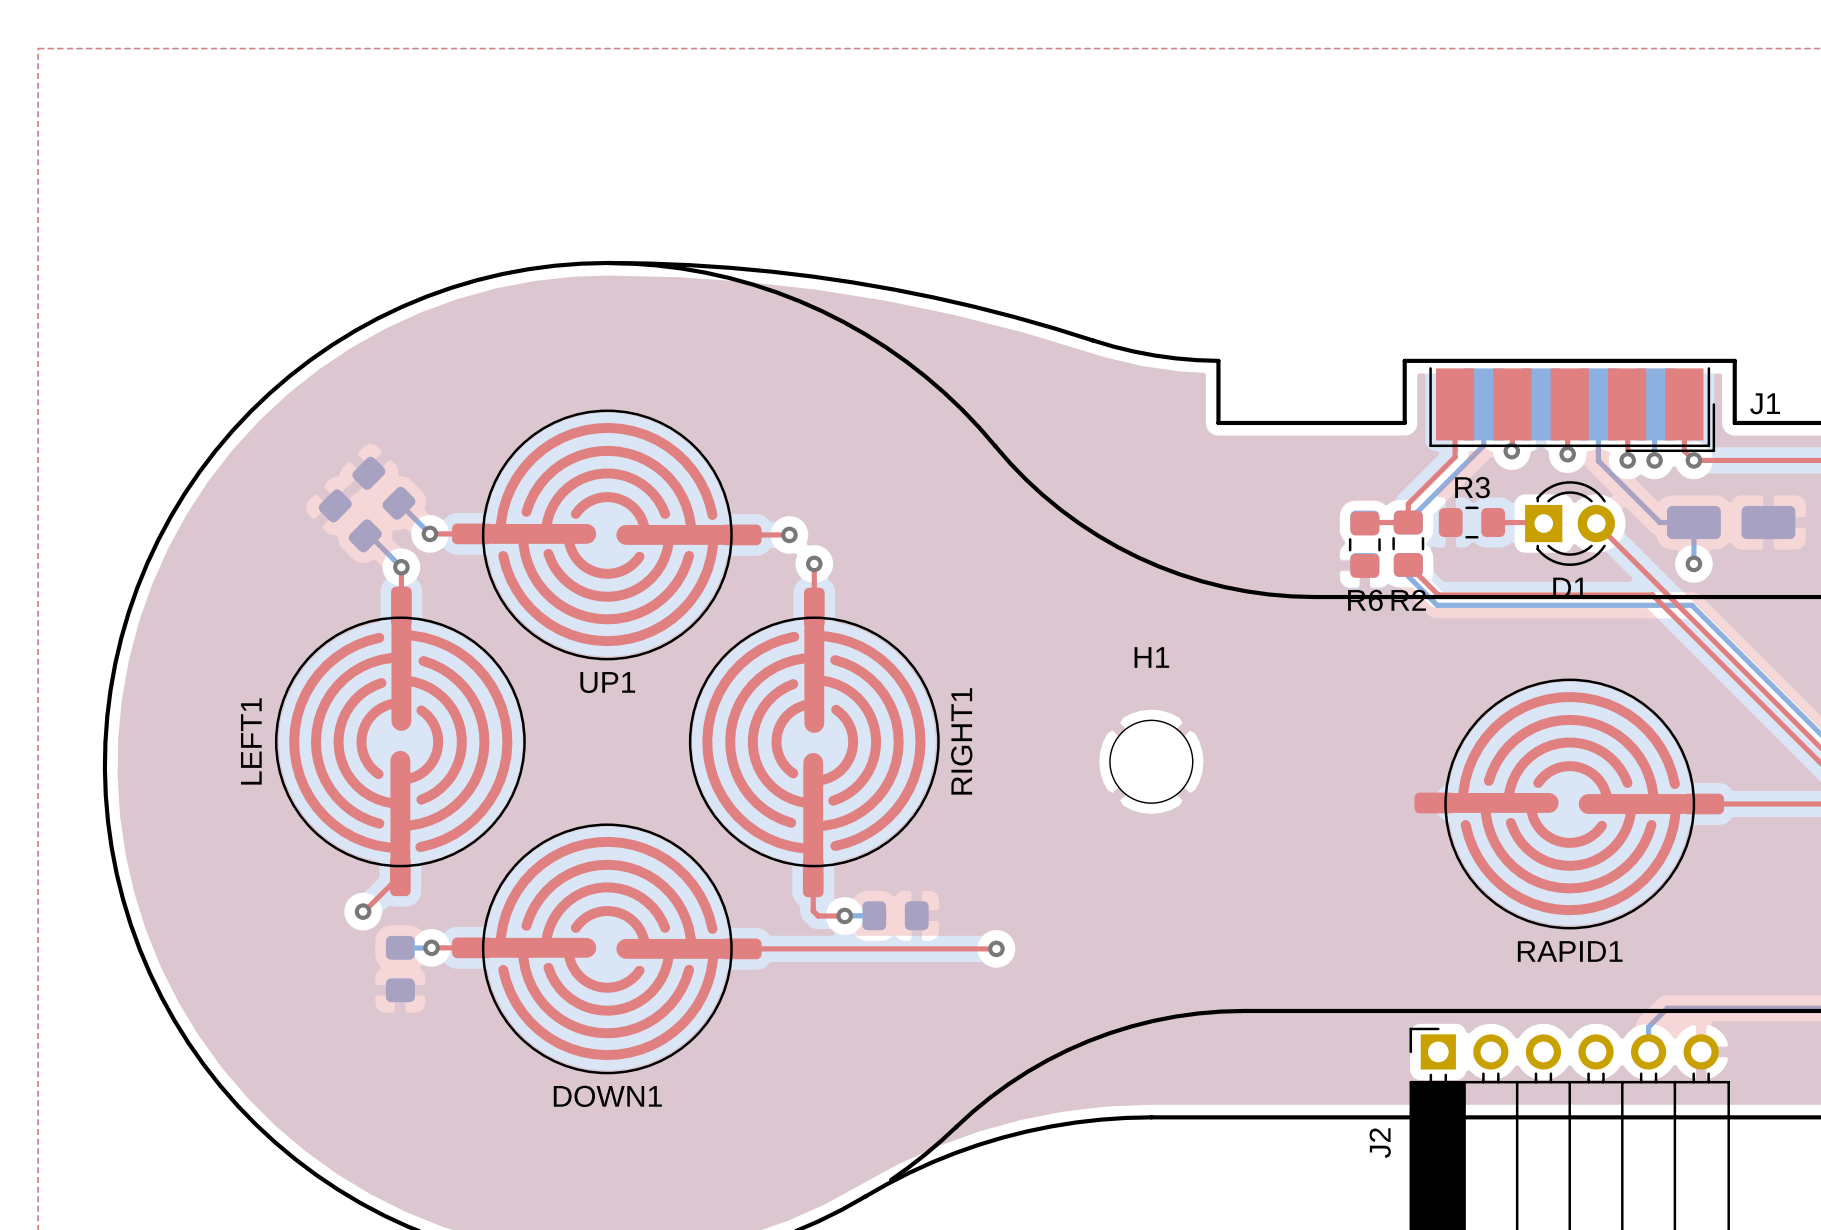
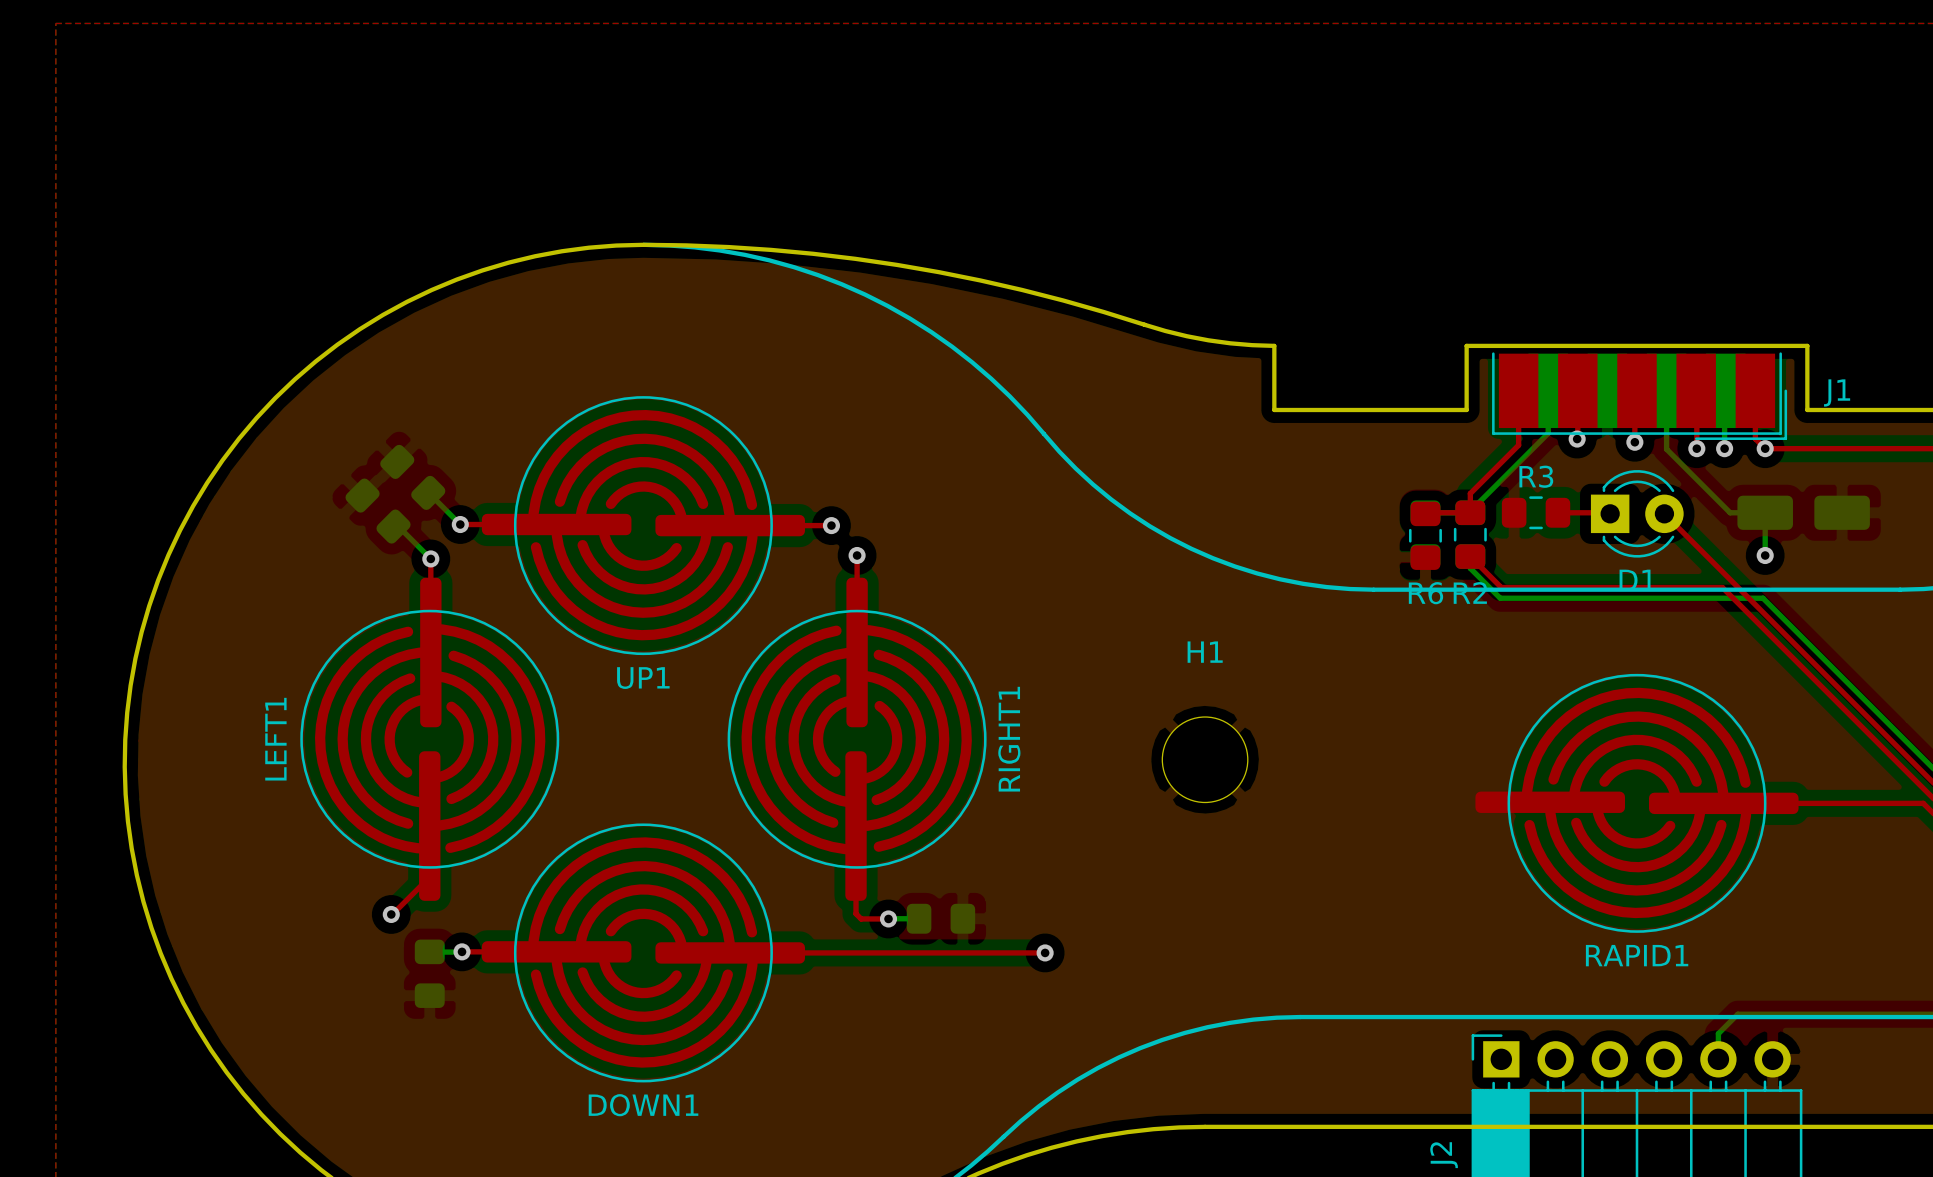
UP1 footprint: [452, 409, 762, 661] -> [481, 396, 805, 656]
LEFT1 footprint: [274, 586, 526, 897] -> [300, 577, 560, 901]
RIGHT1 footprint: [688, 587, 940, 898] -> [727, 577, 987, 901]
RAPID1 footprint: [1414, 678, 1724, 930] -> [1475, 673, 1799, 933]
DOWN1 footprint: [452, 823, 762, 1075] -> [481, 823, 805, 1083]

